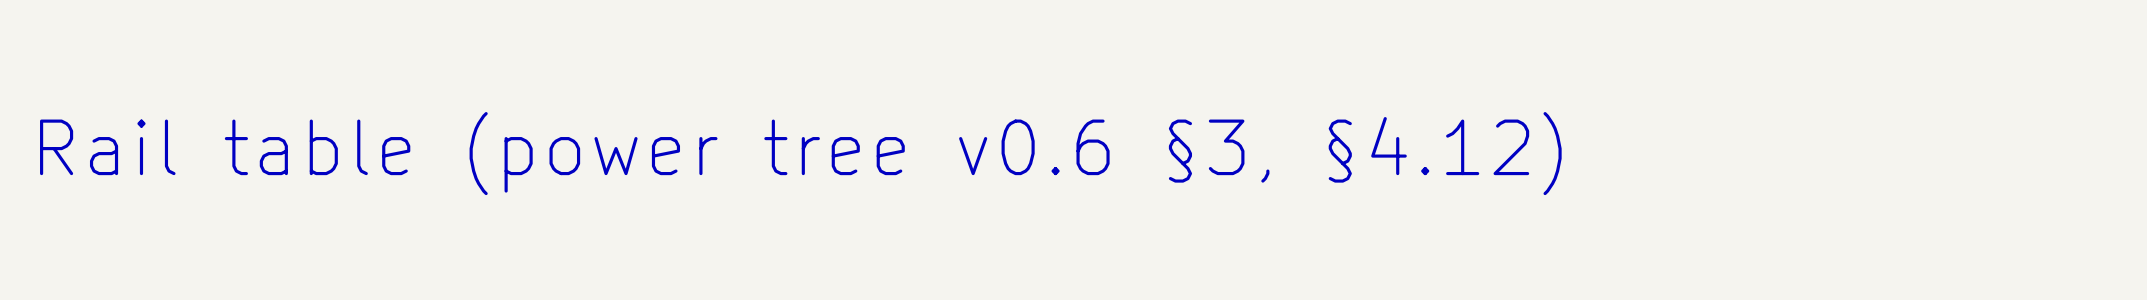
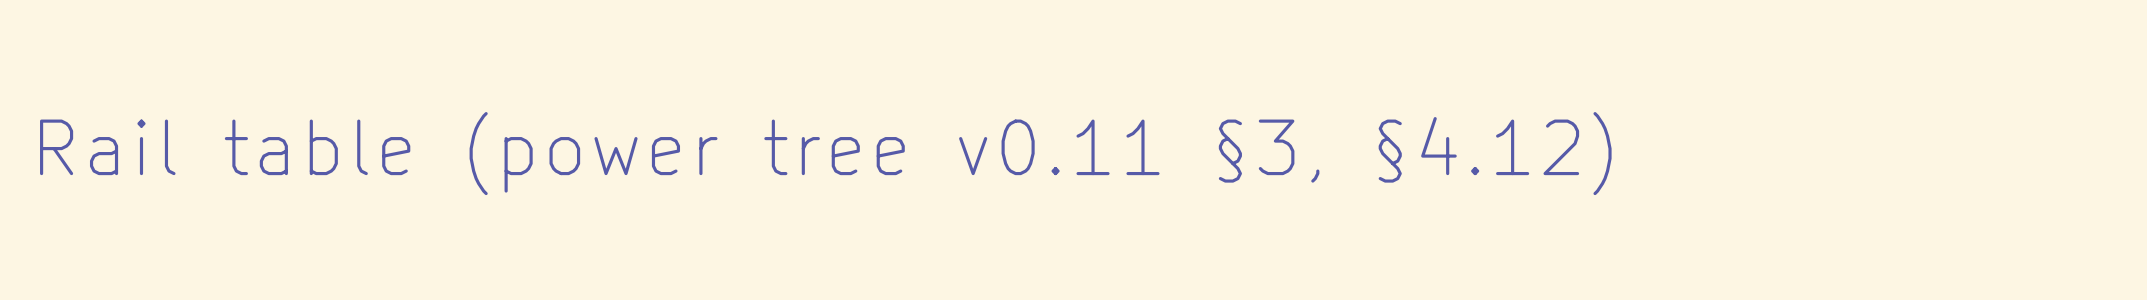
text: Rail table (power tree v0.6 §3, §4.12) (800, 153) -> Rail table (power tree v0.11 §3, §4.12) (825, 153)

